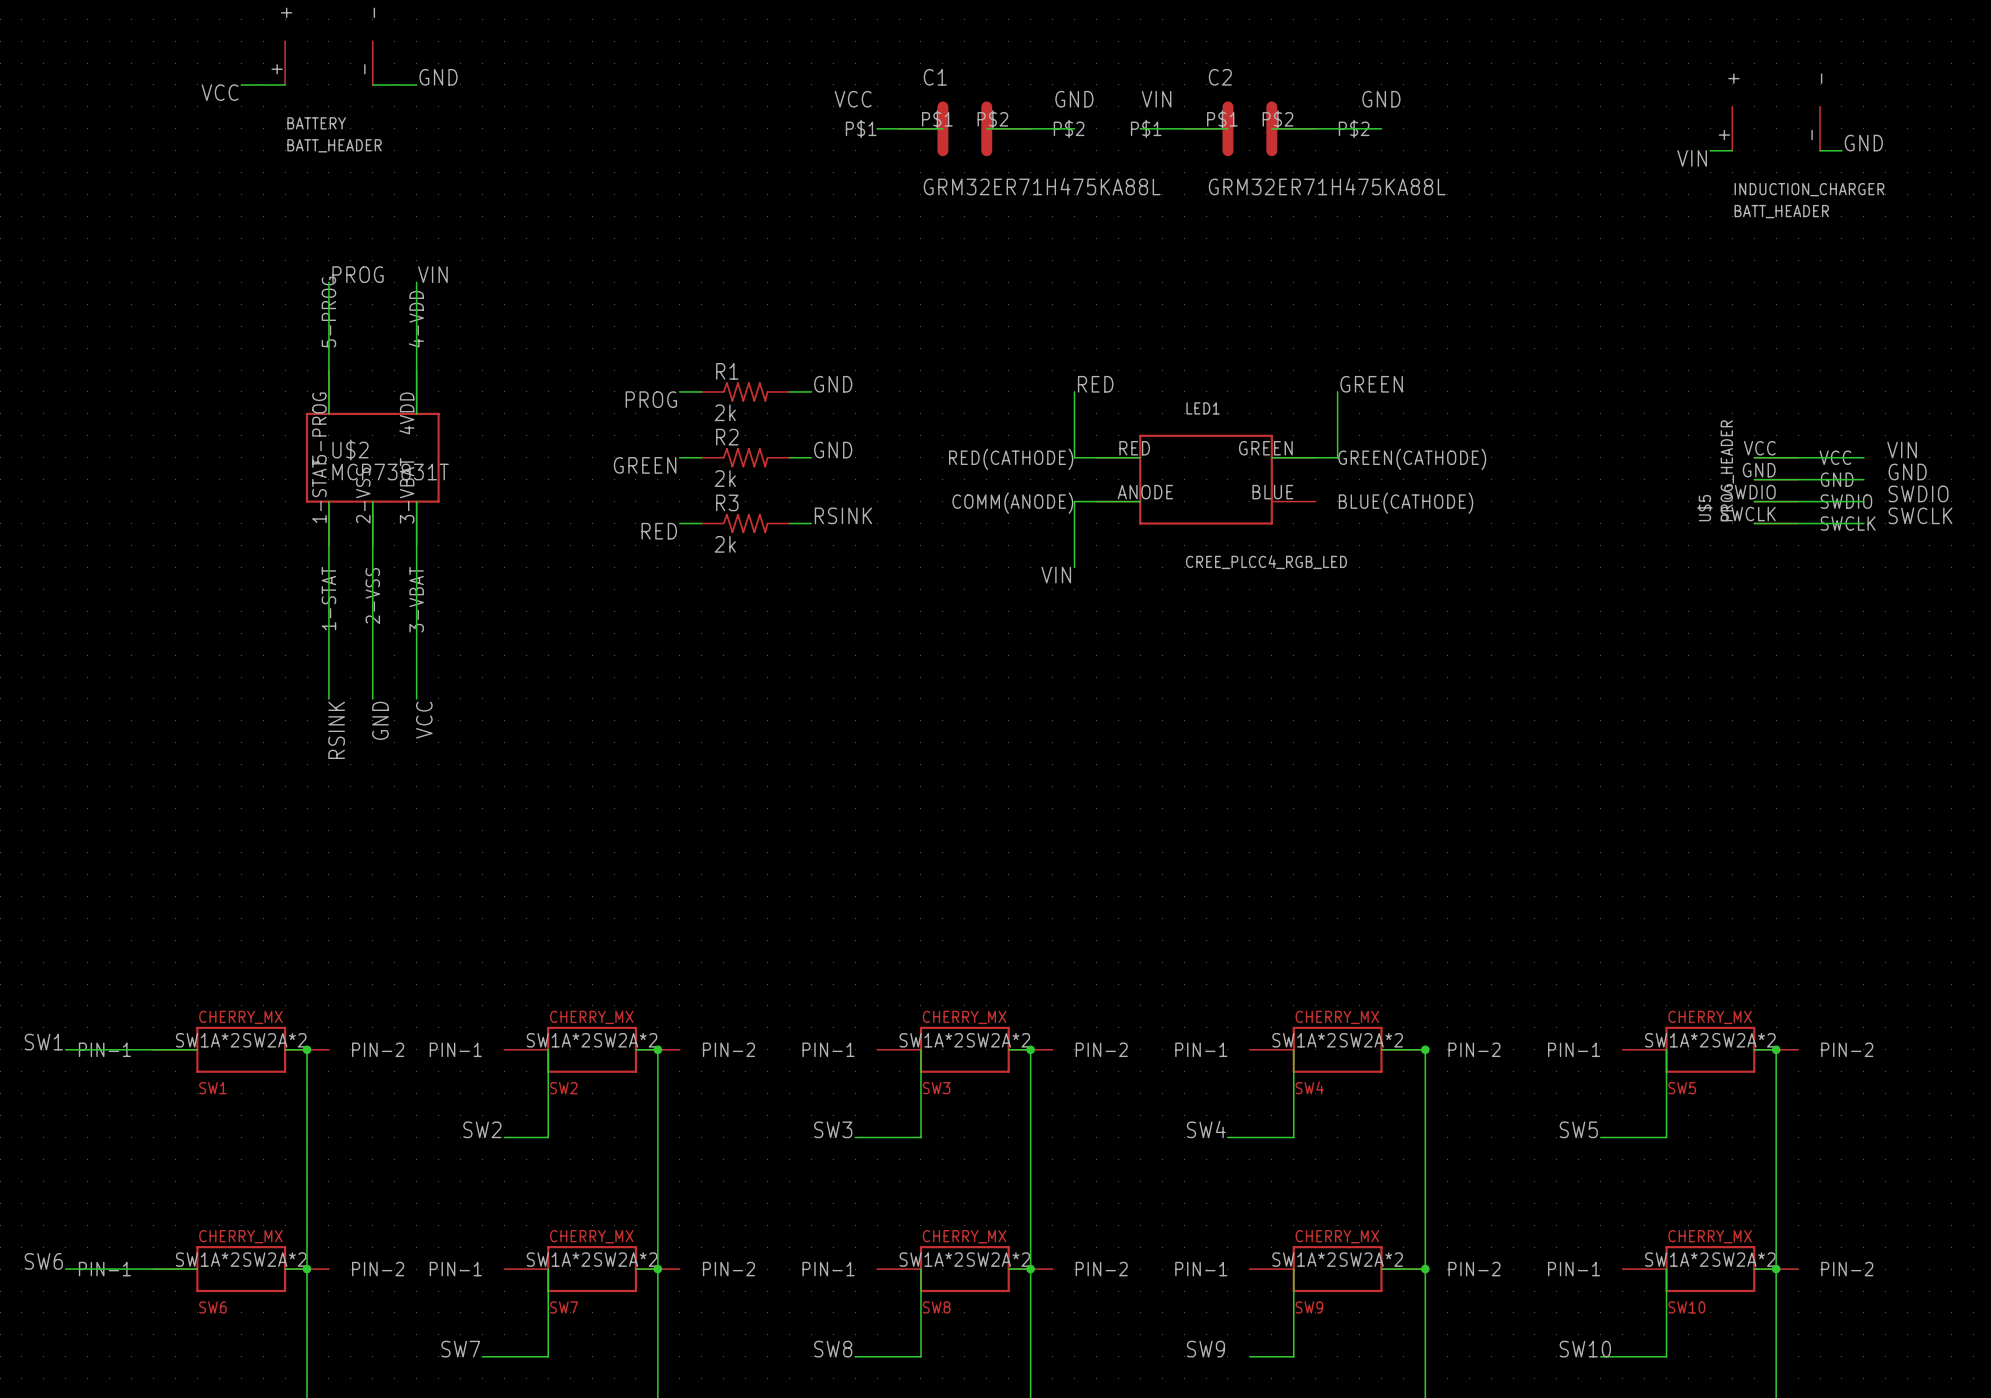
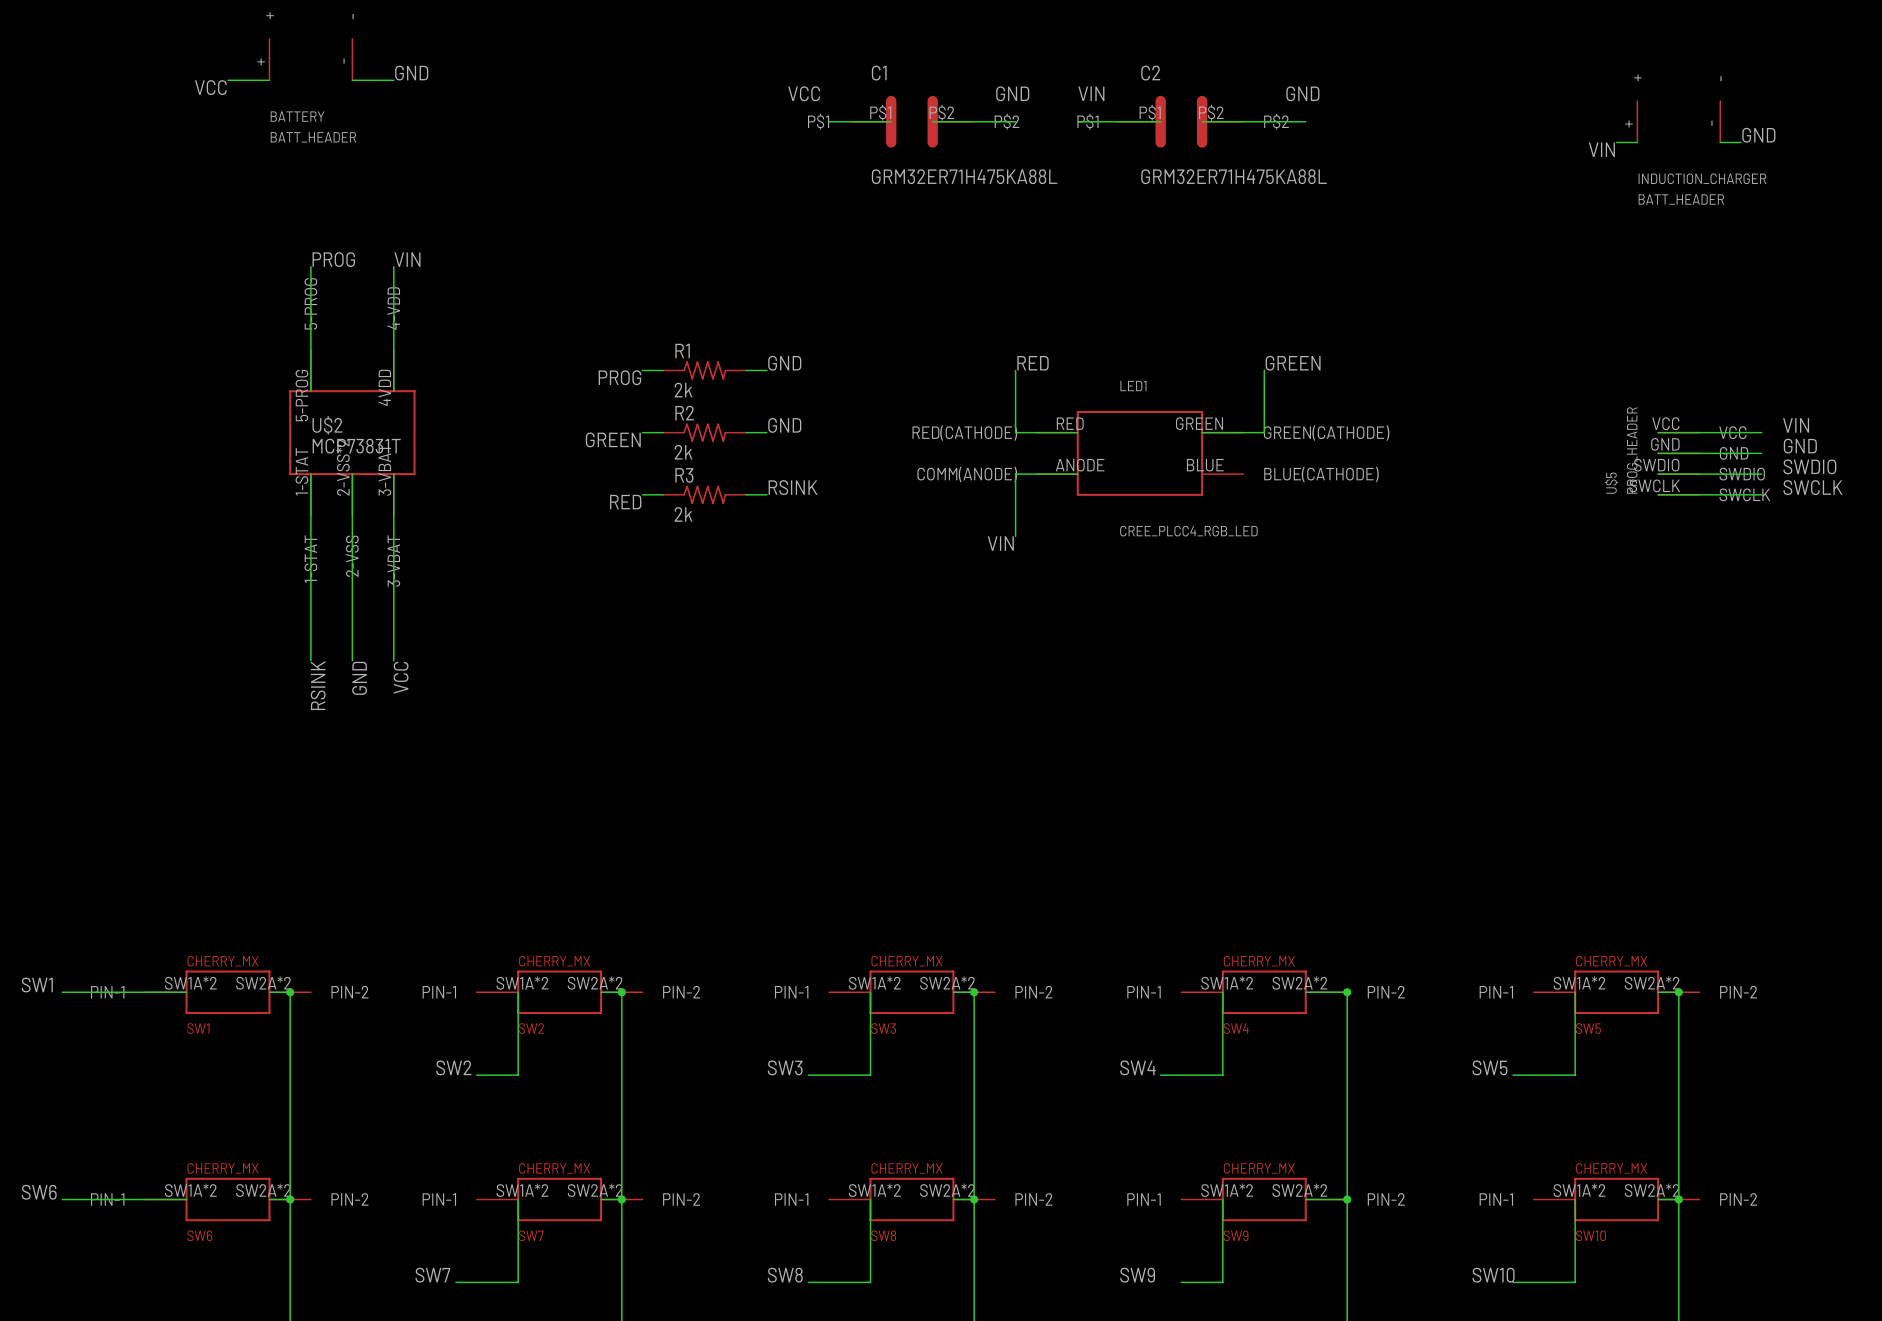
U$2 pin number: 2-VSS (363, 495) -> 2-VSS*2 (343, 467)

